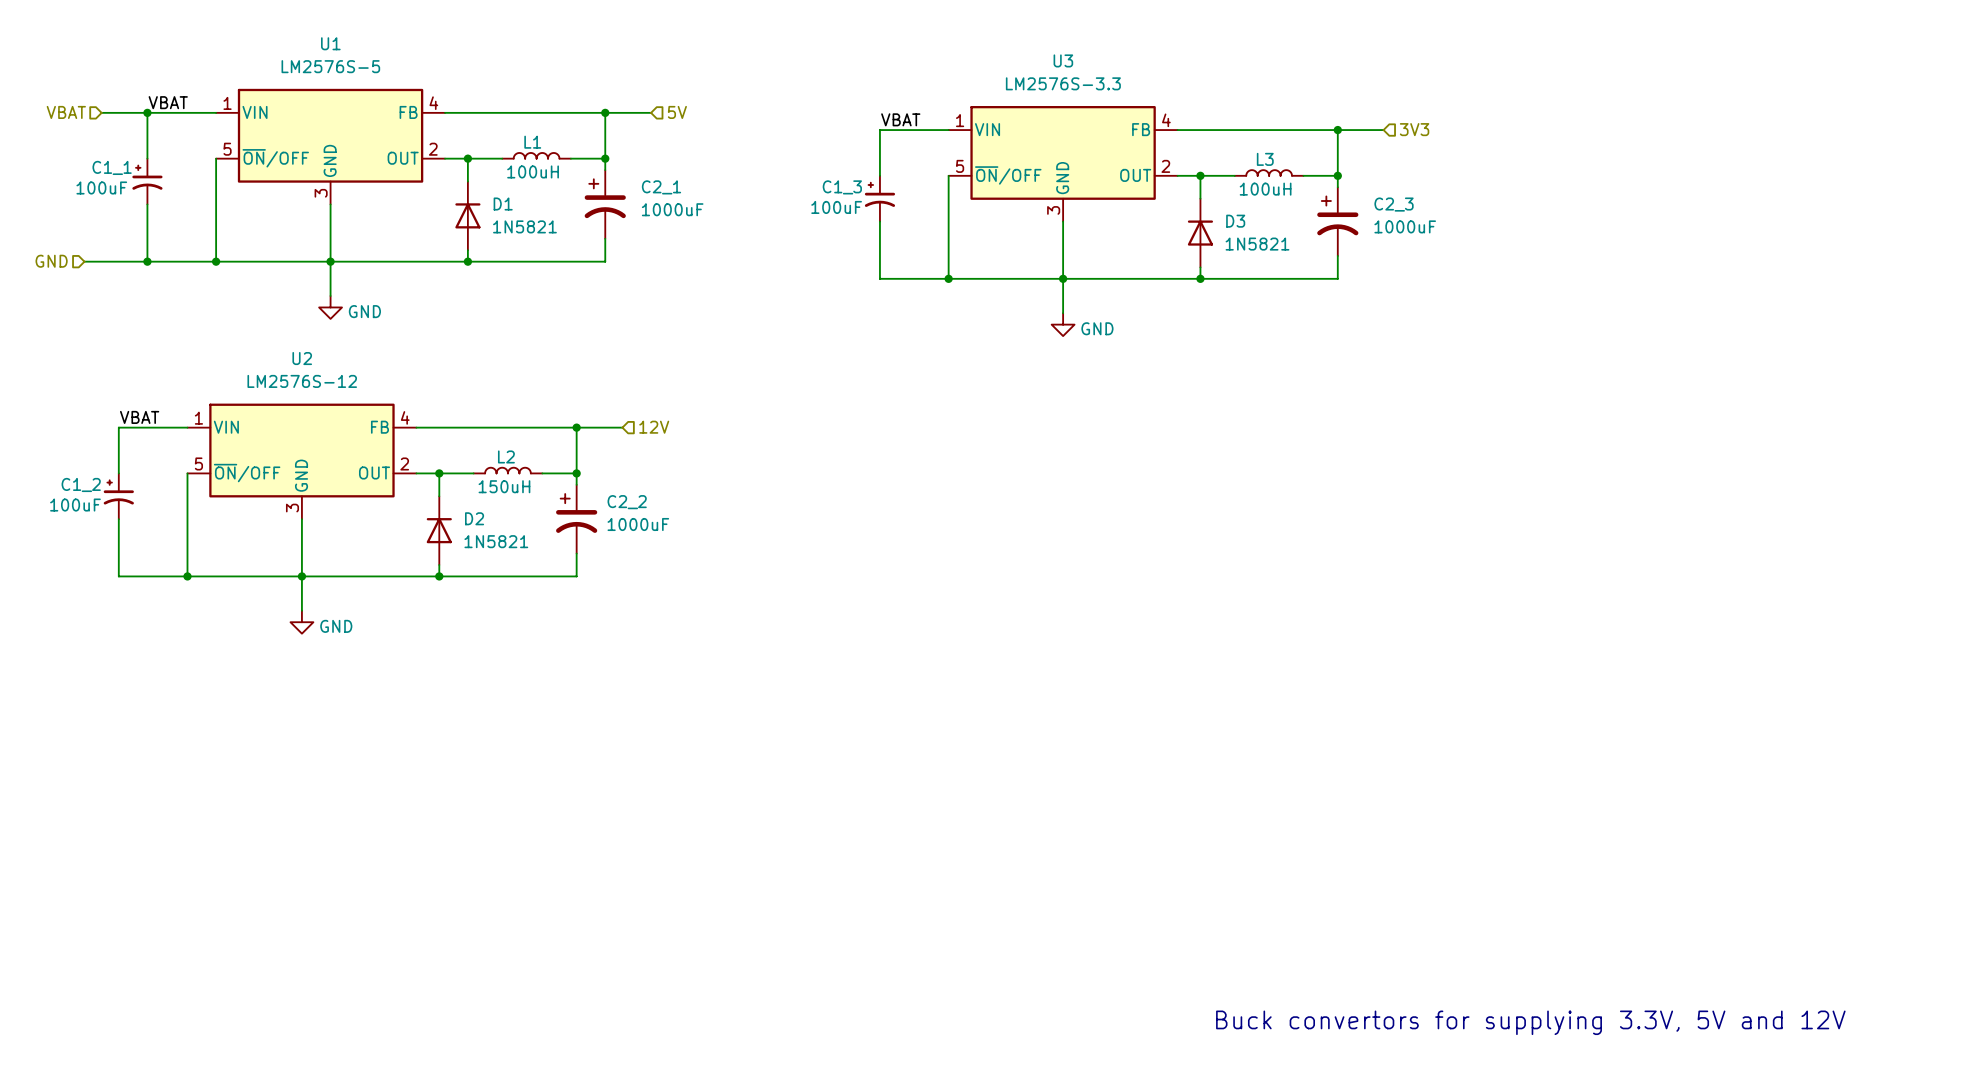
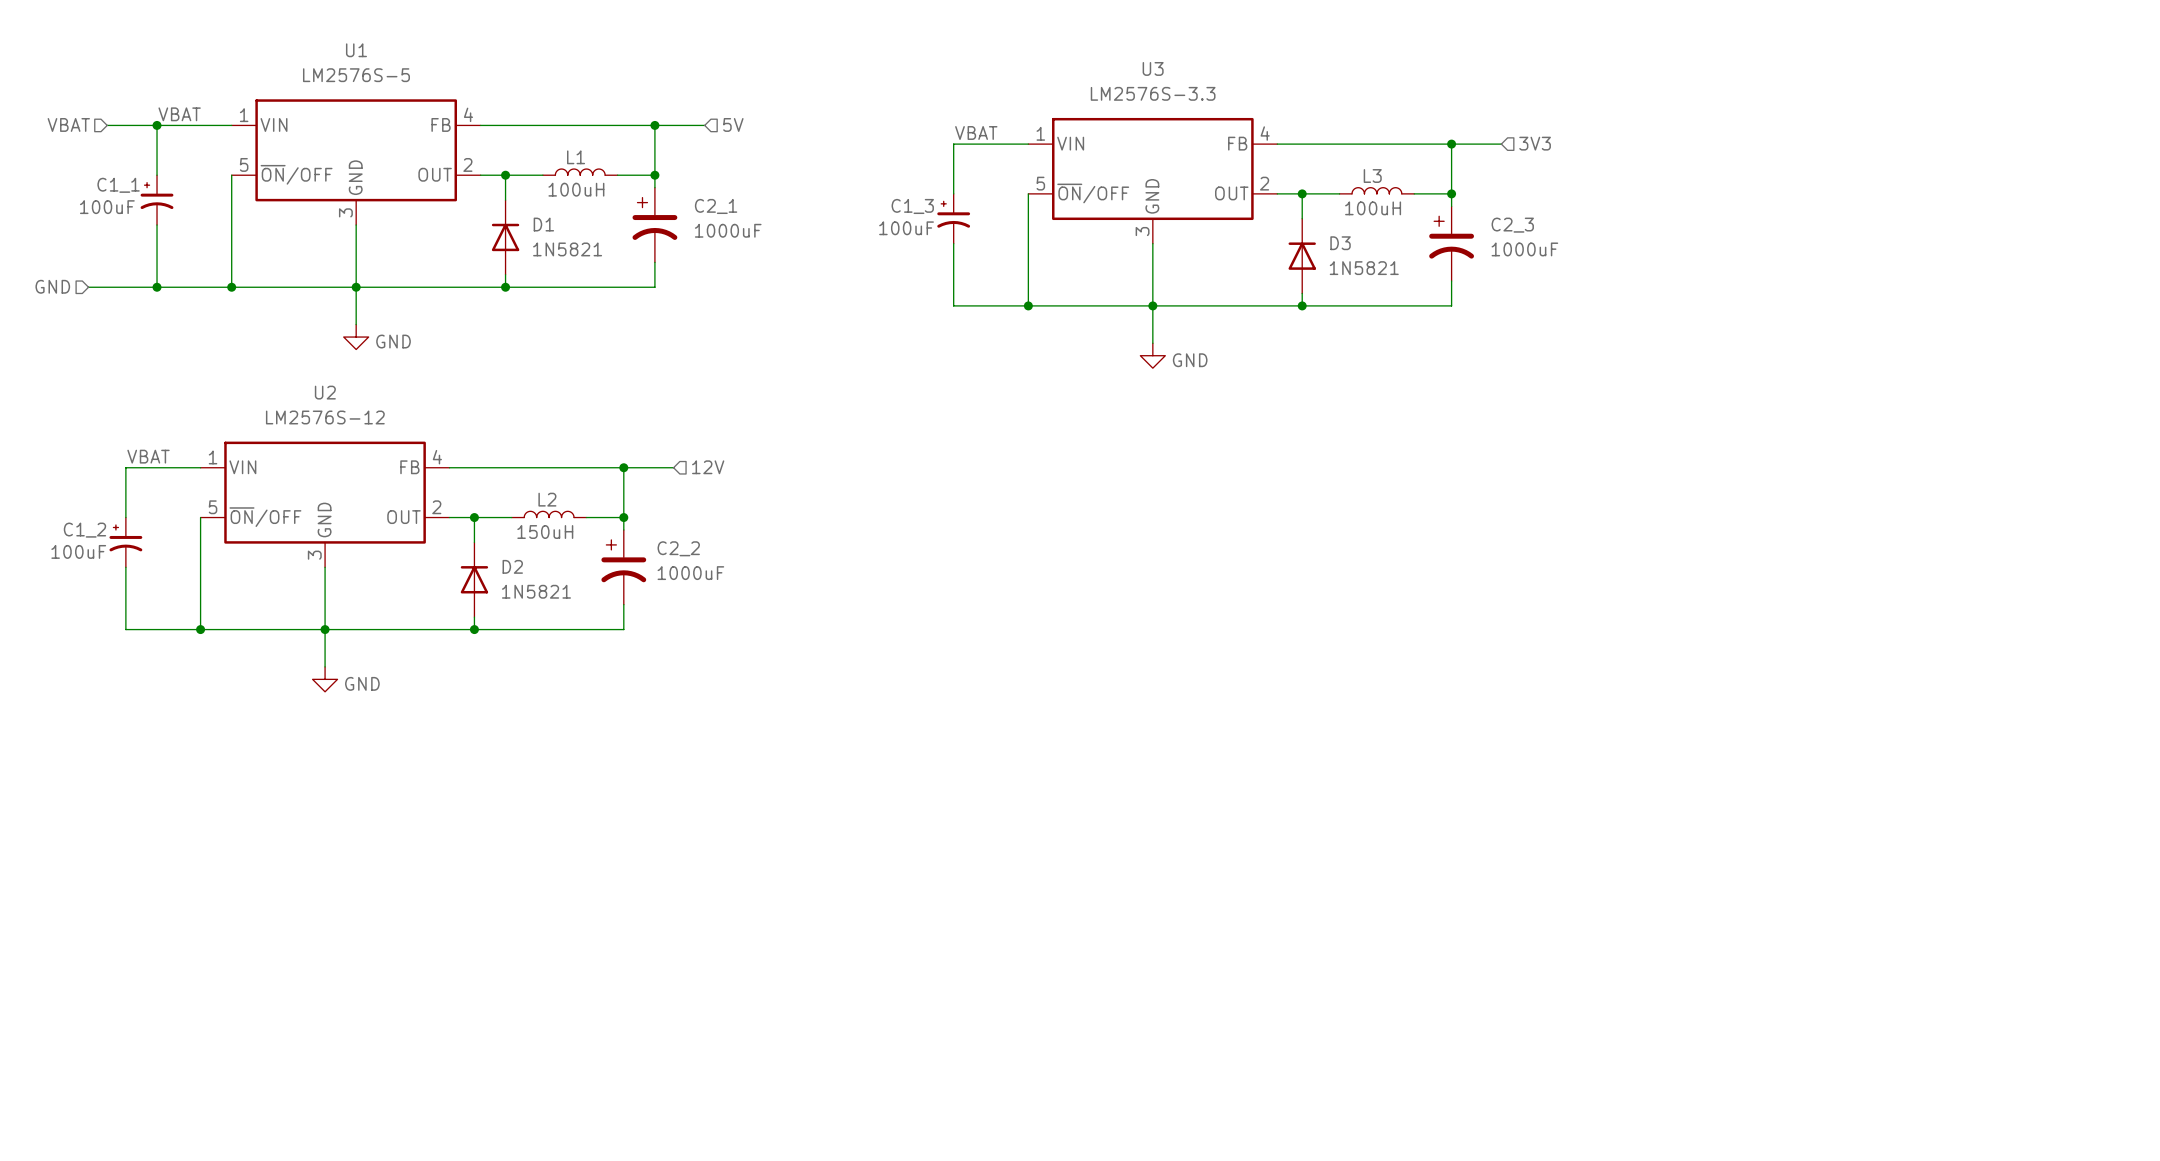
text: Buck convertors for supplying 3.3V, 5V and 12V (1530, 1022) -> none

